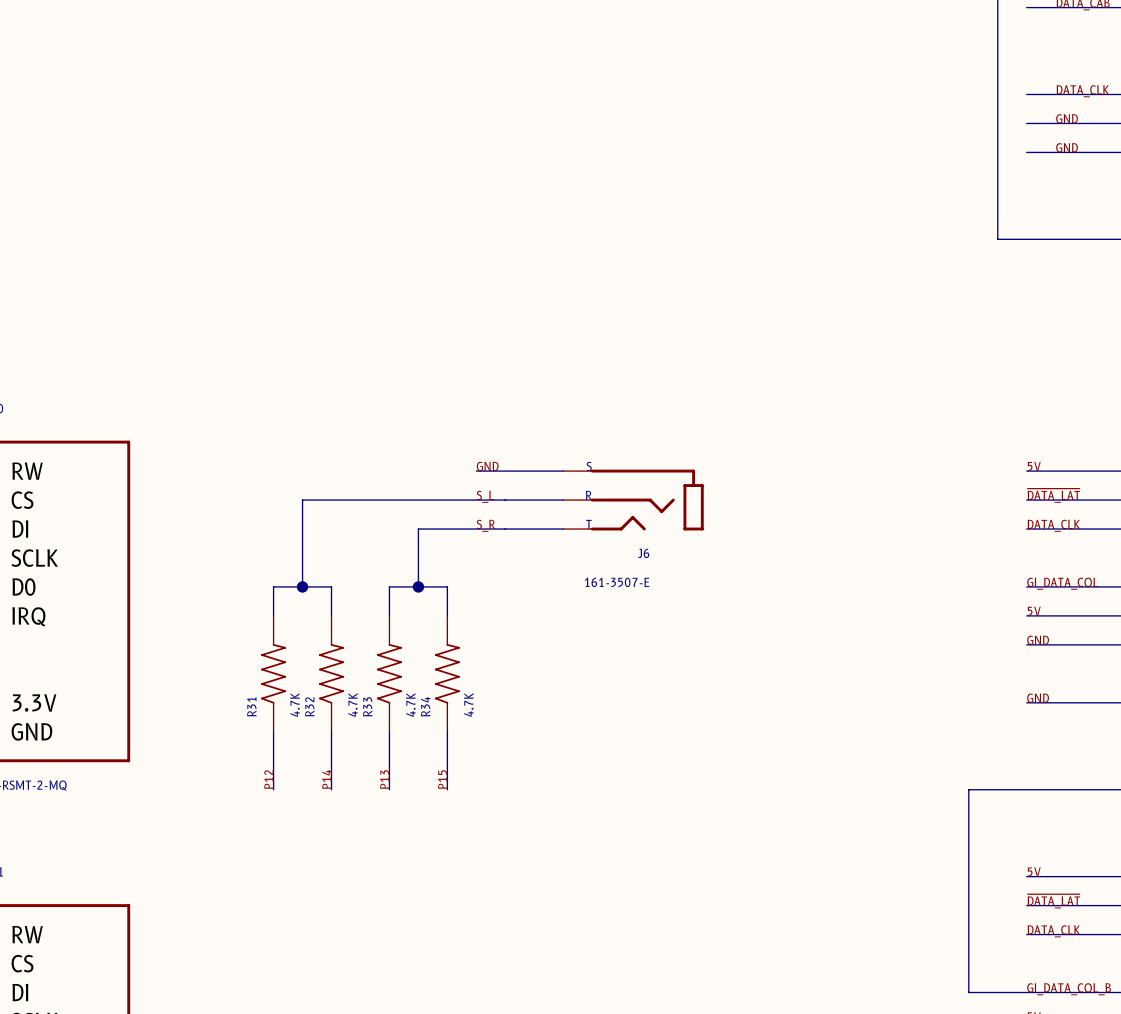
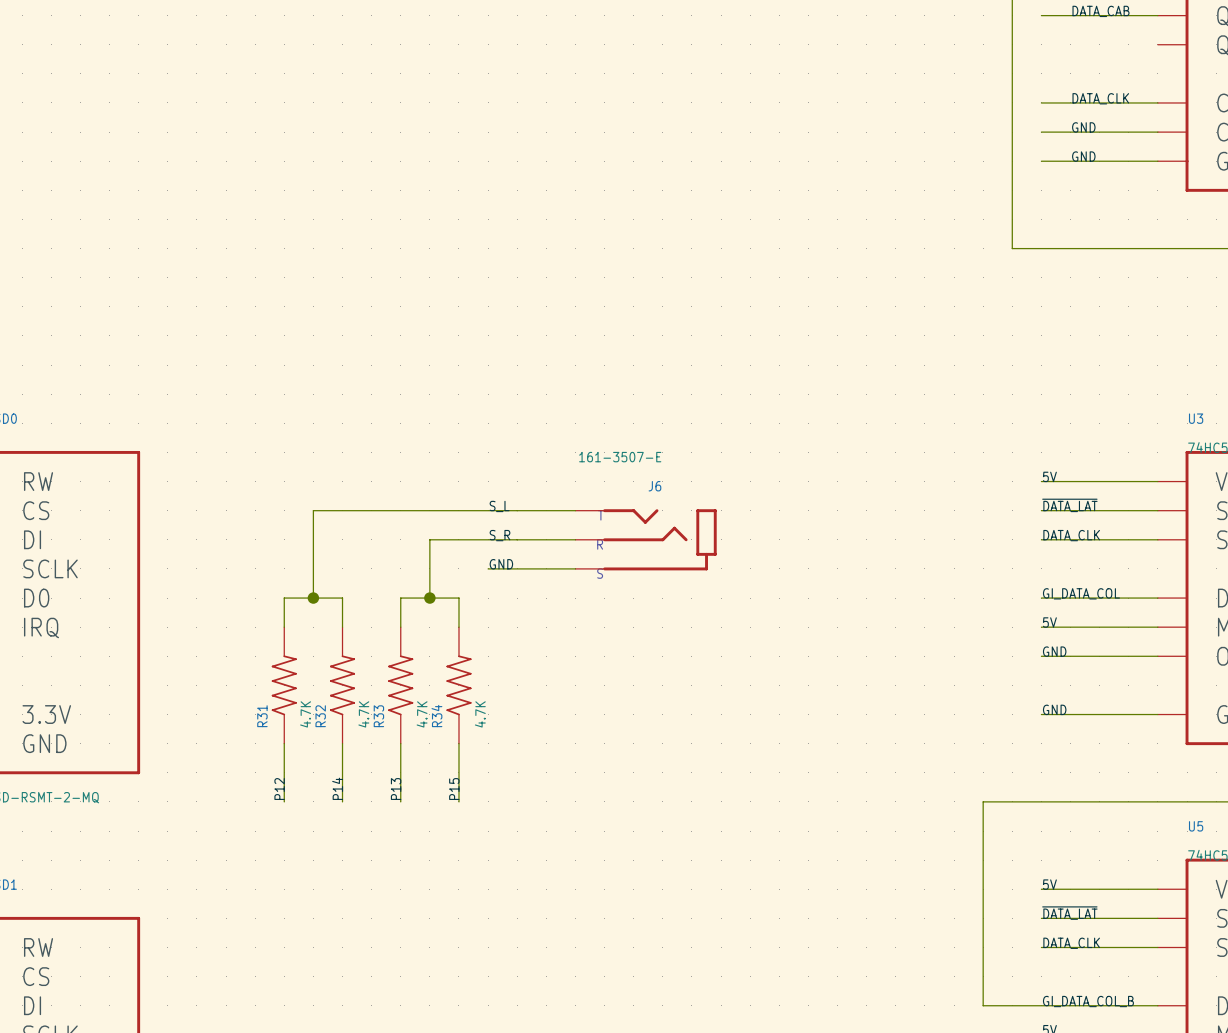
label position: GND (487, 466) -> GND (501, 564)
J6 symbol: [563, 469, 704, 531] -> [575, 509, 717, 571]
wire: (476, 471) (563, 471) -> (488, 568) (575, 568)
J6 name position: J6 (643, 553) -> J6 (654, 486)
J6 value position: 161-3507-E (617, 582) -> 161-3507-E (620, 457)

